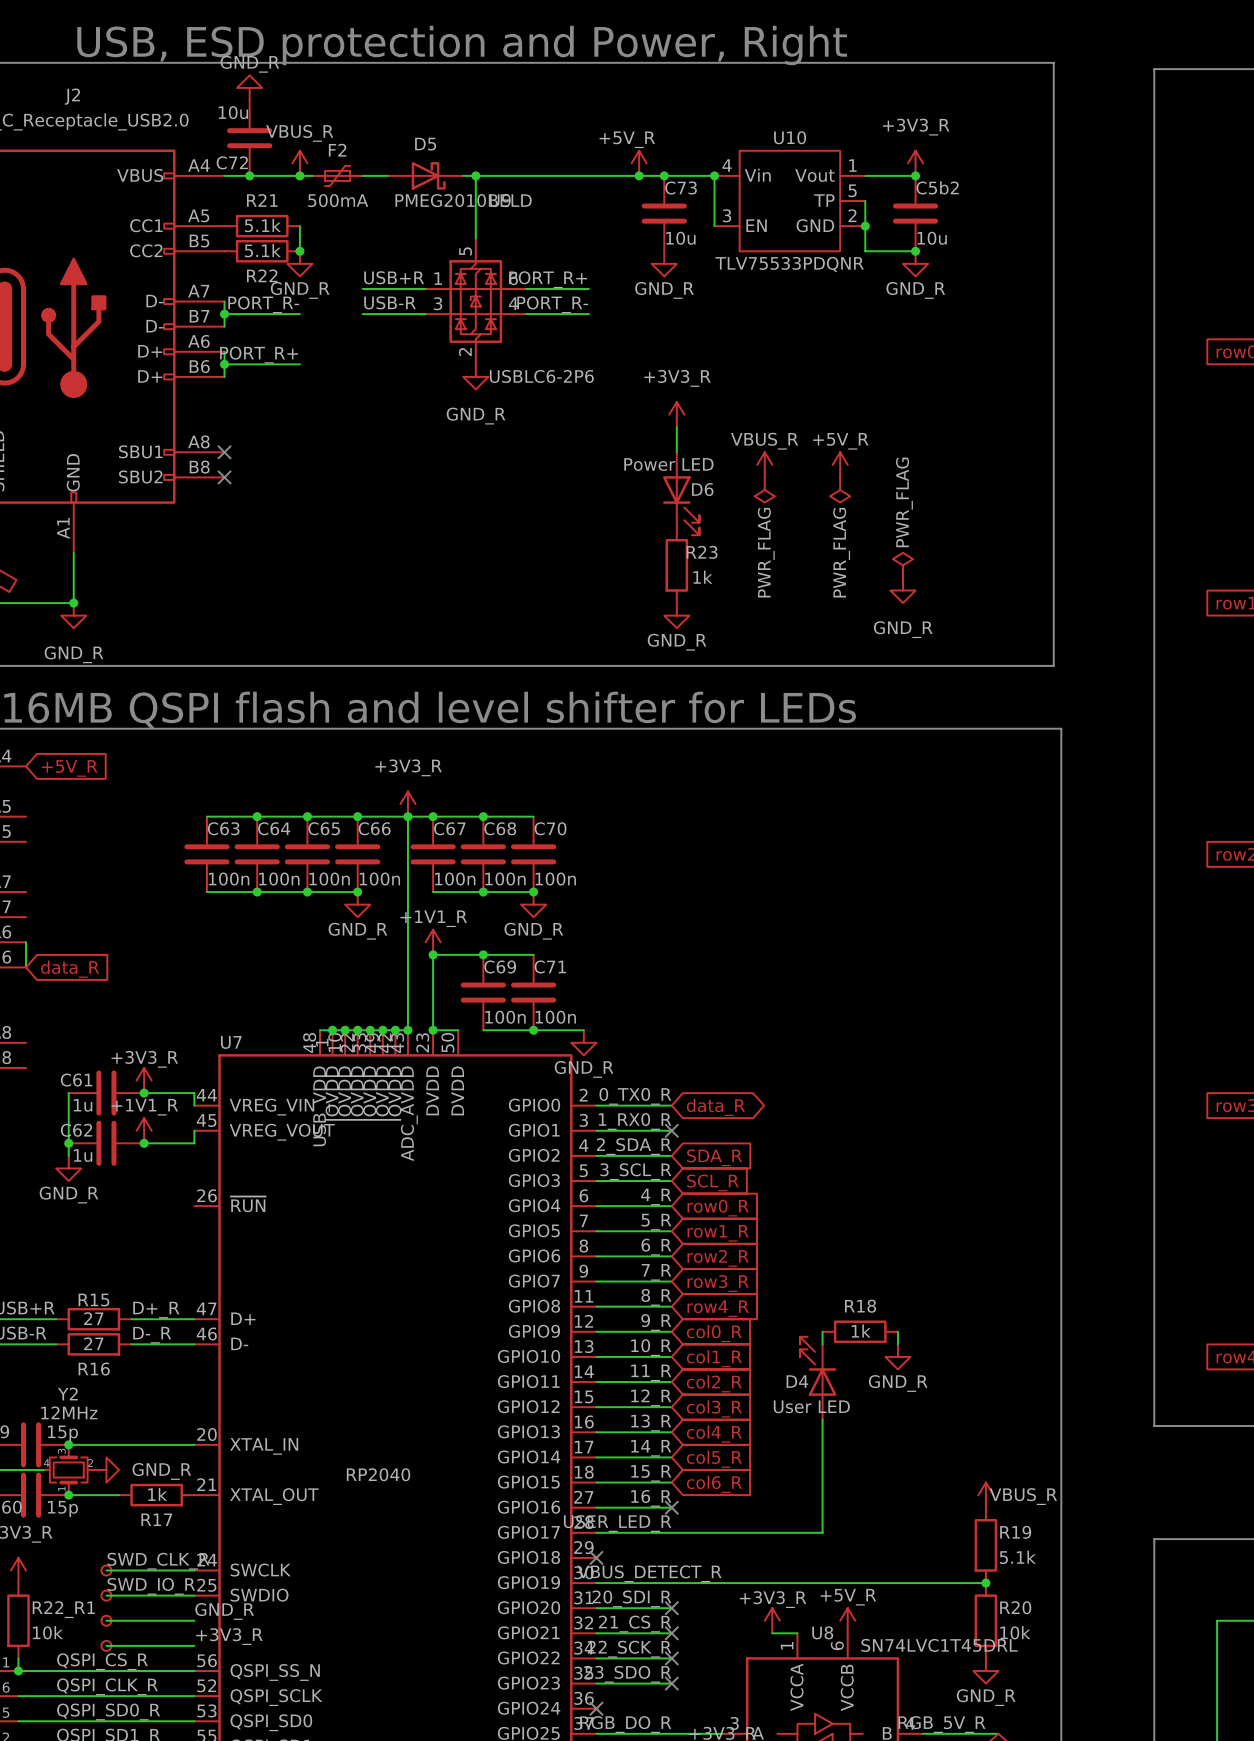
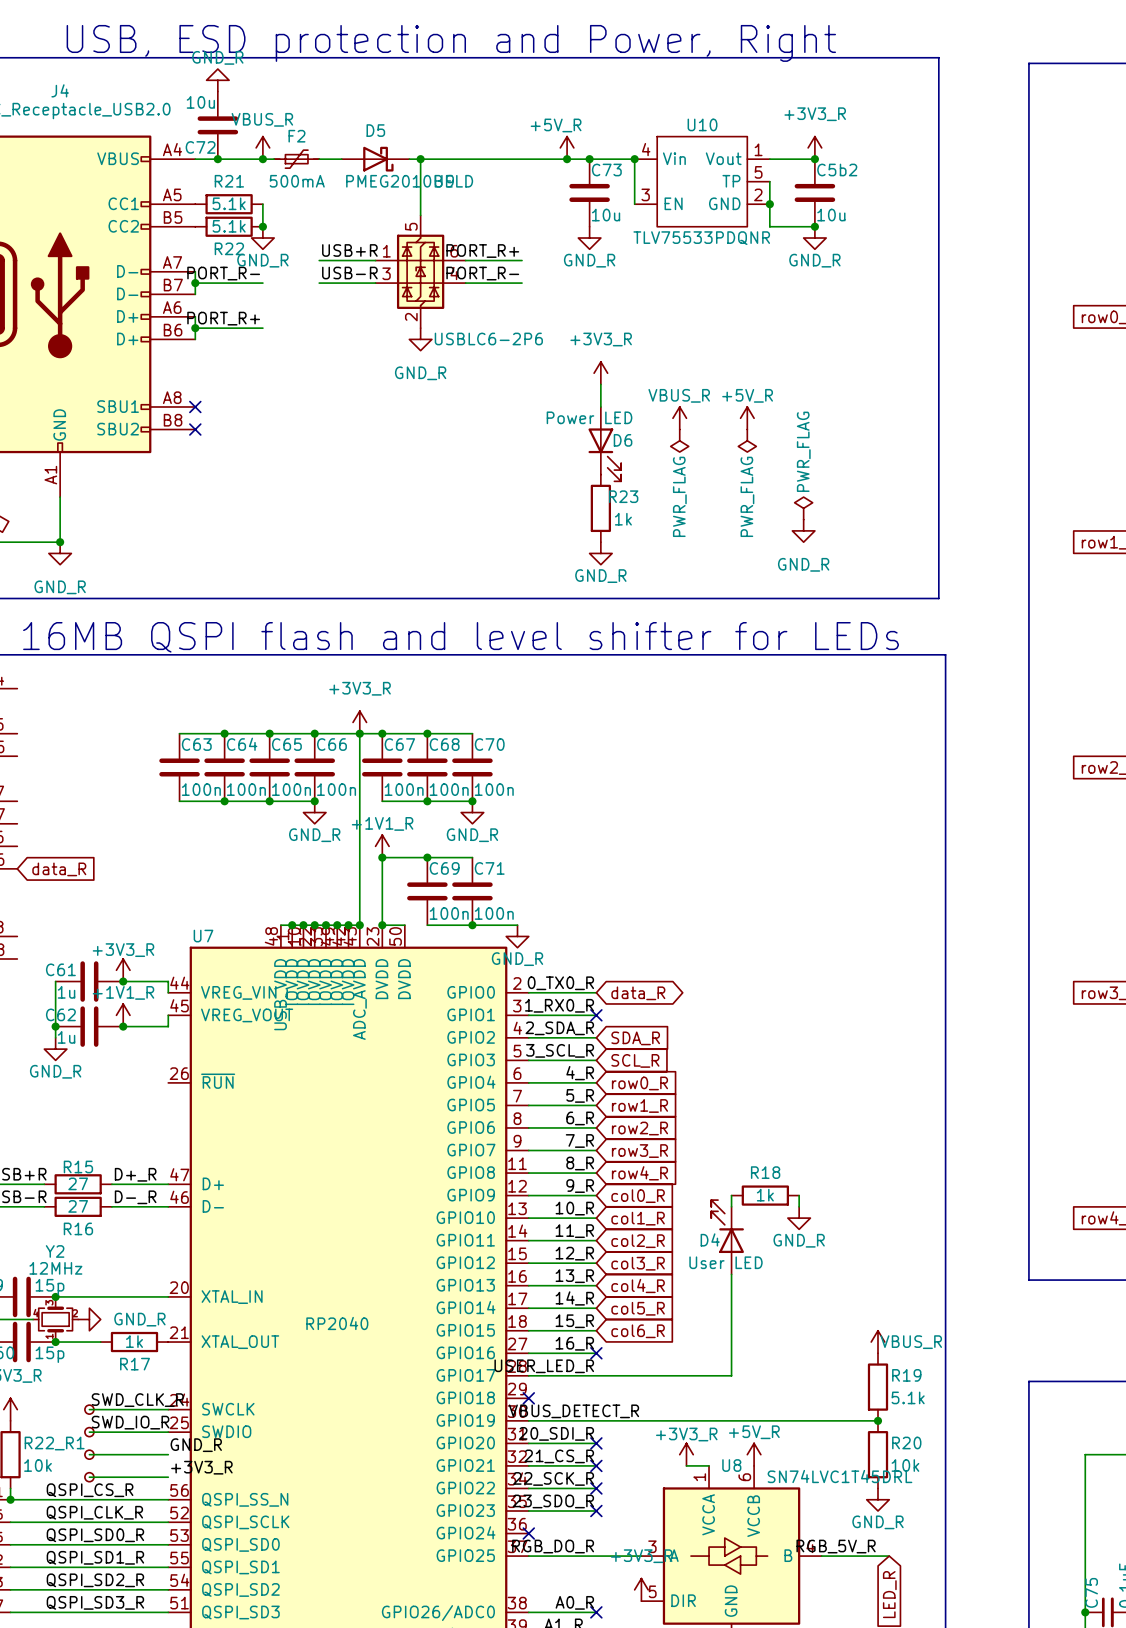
J2 name: J2 (72, 96) -> J4 (60, 90)
global label: +5V_R (69, 768) -> none
wire: (26, 942) (26, 967) -> none

